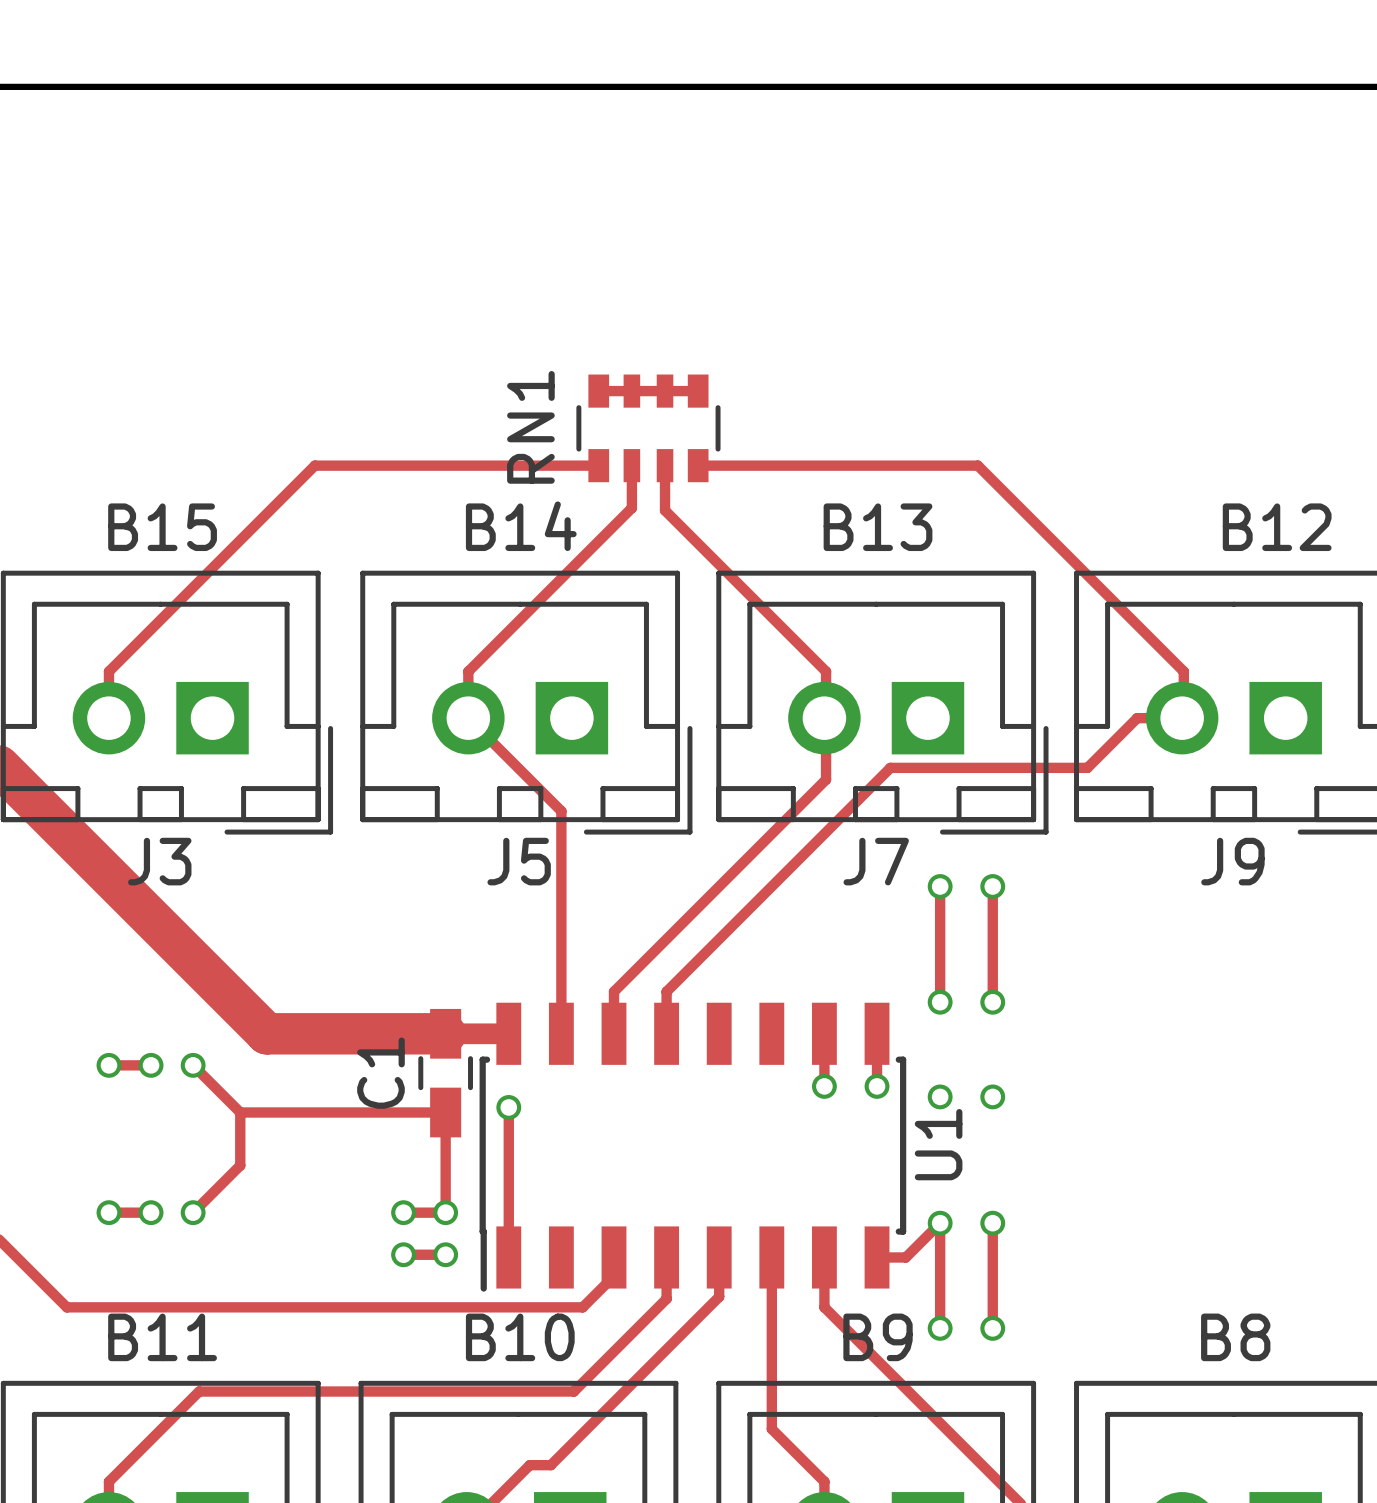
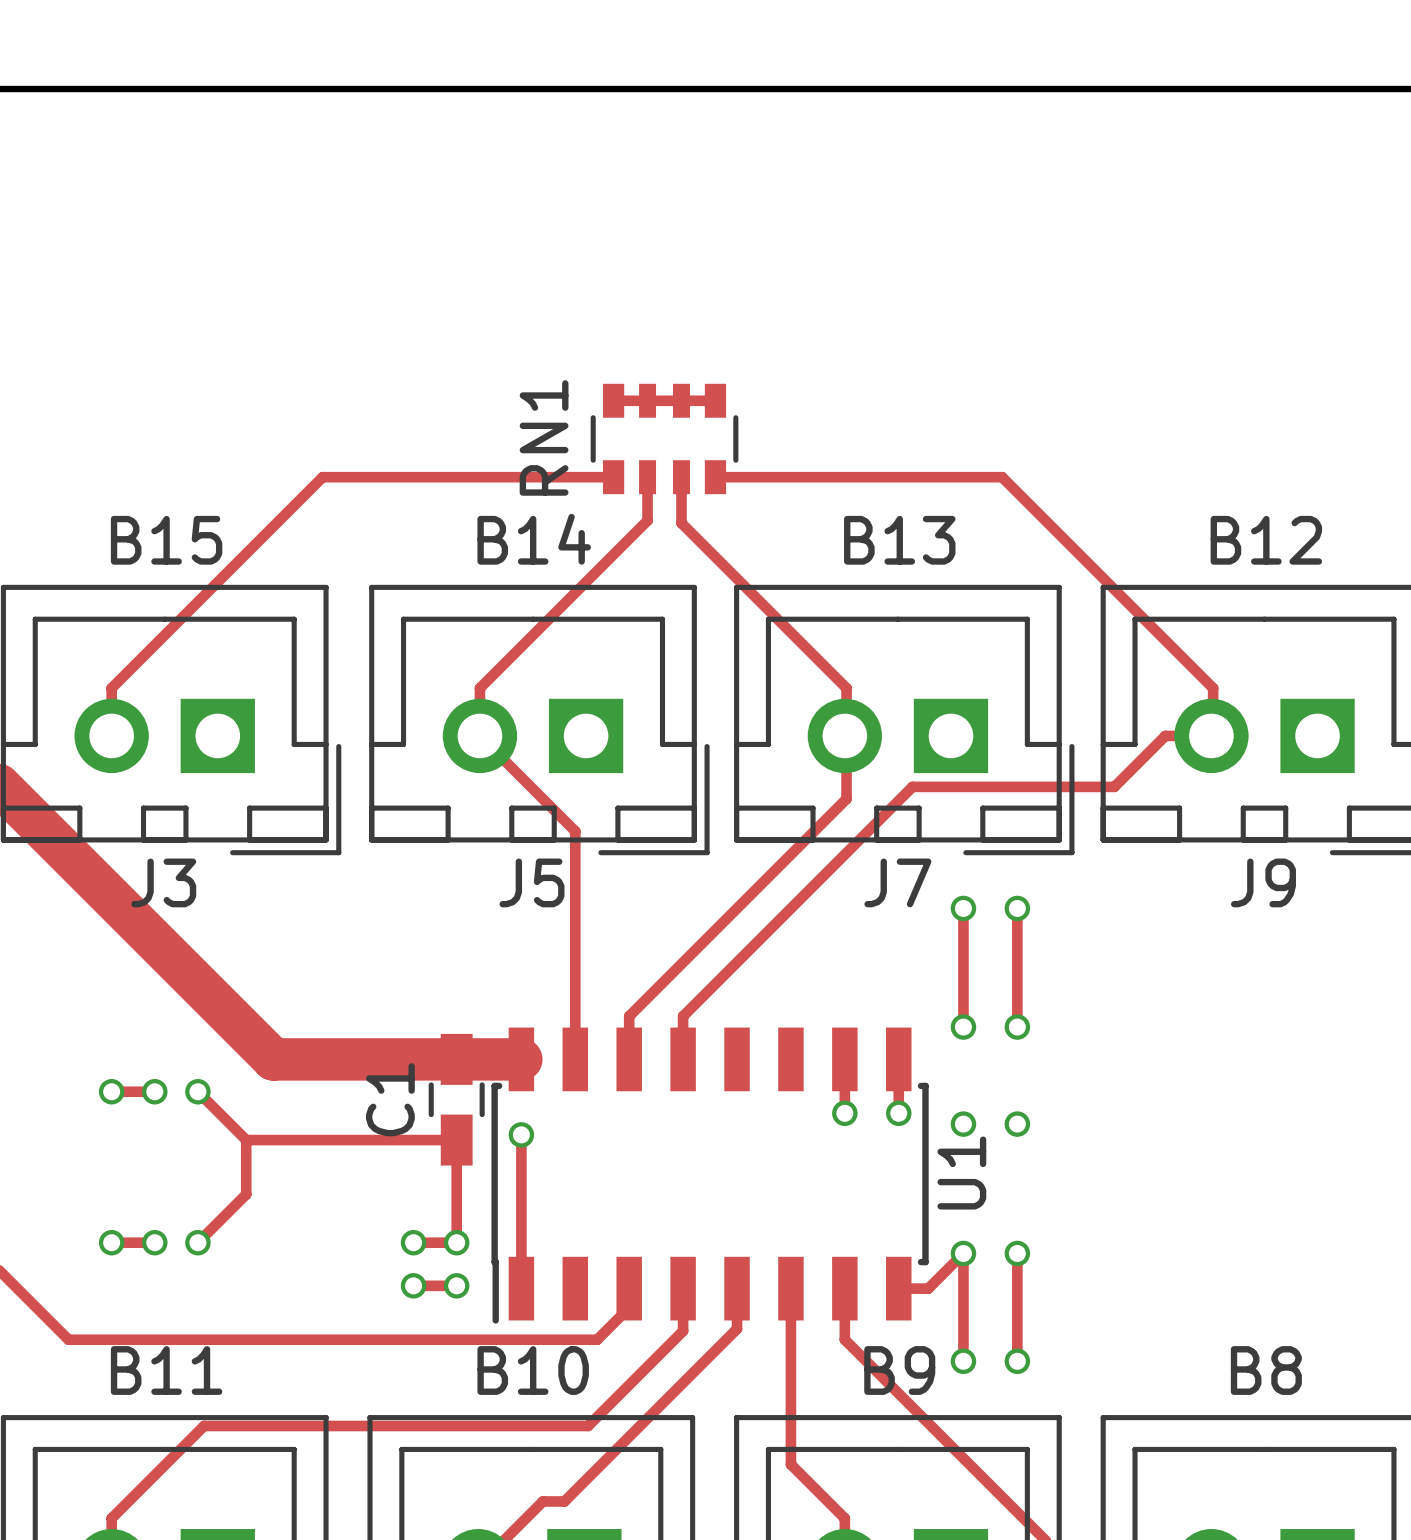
text position: B12 (1277, 527) -> B12 (1266, 540)
track width: thin (445, 1033) (508, 1033) -> thick (456, 1059) (521, 1059)

